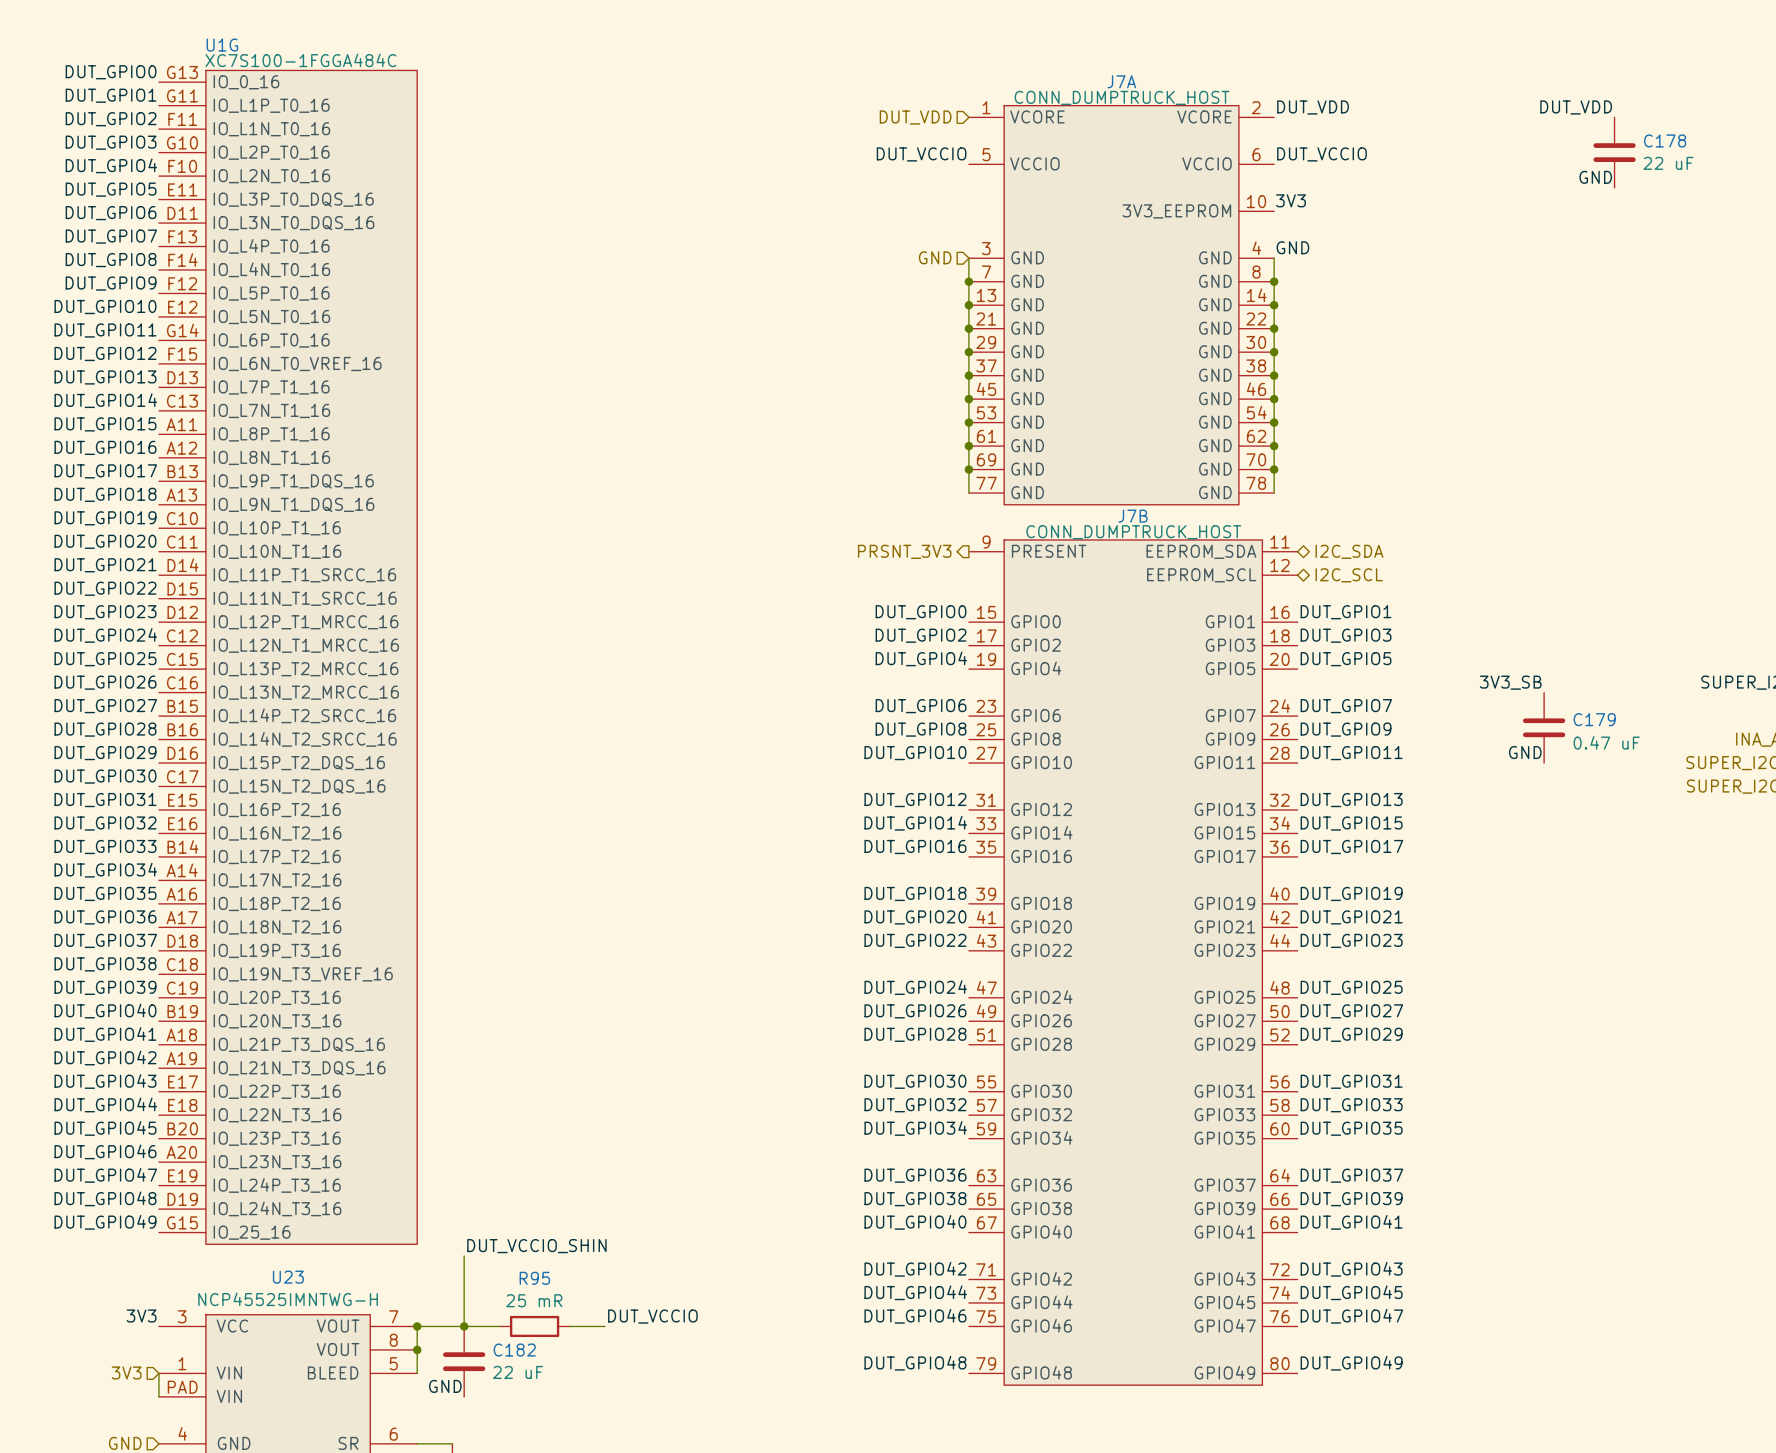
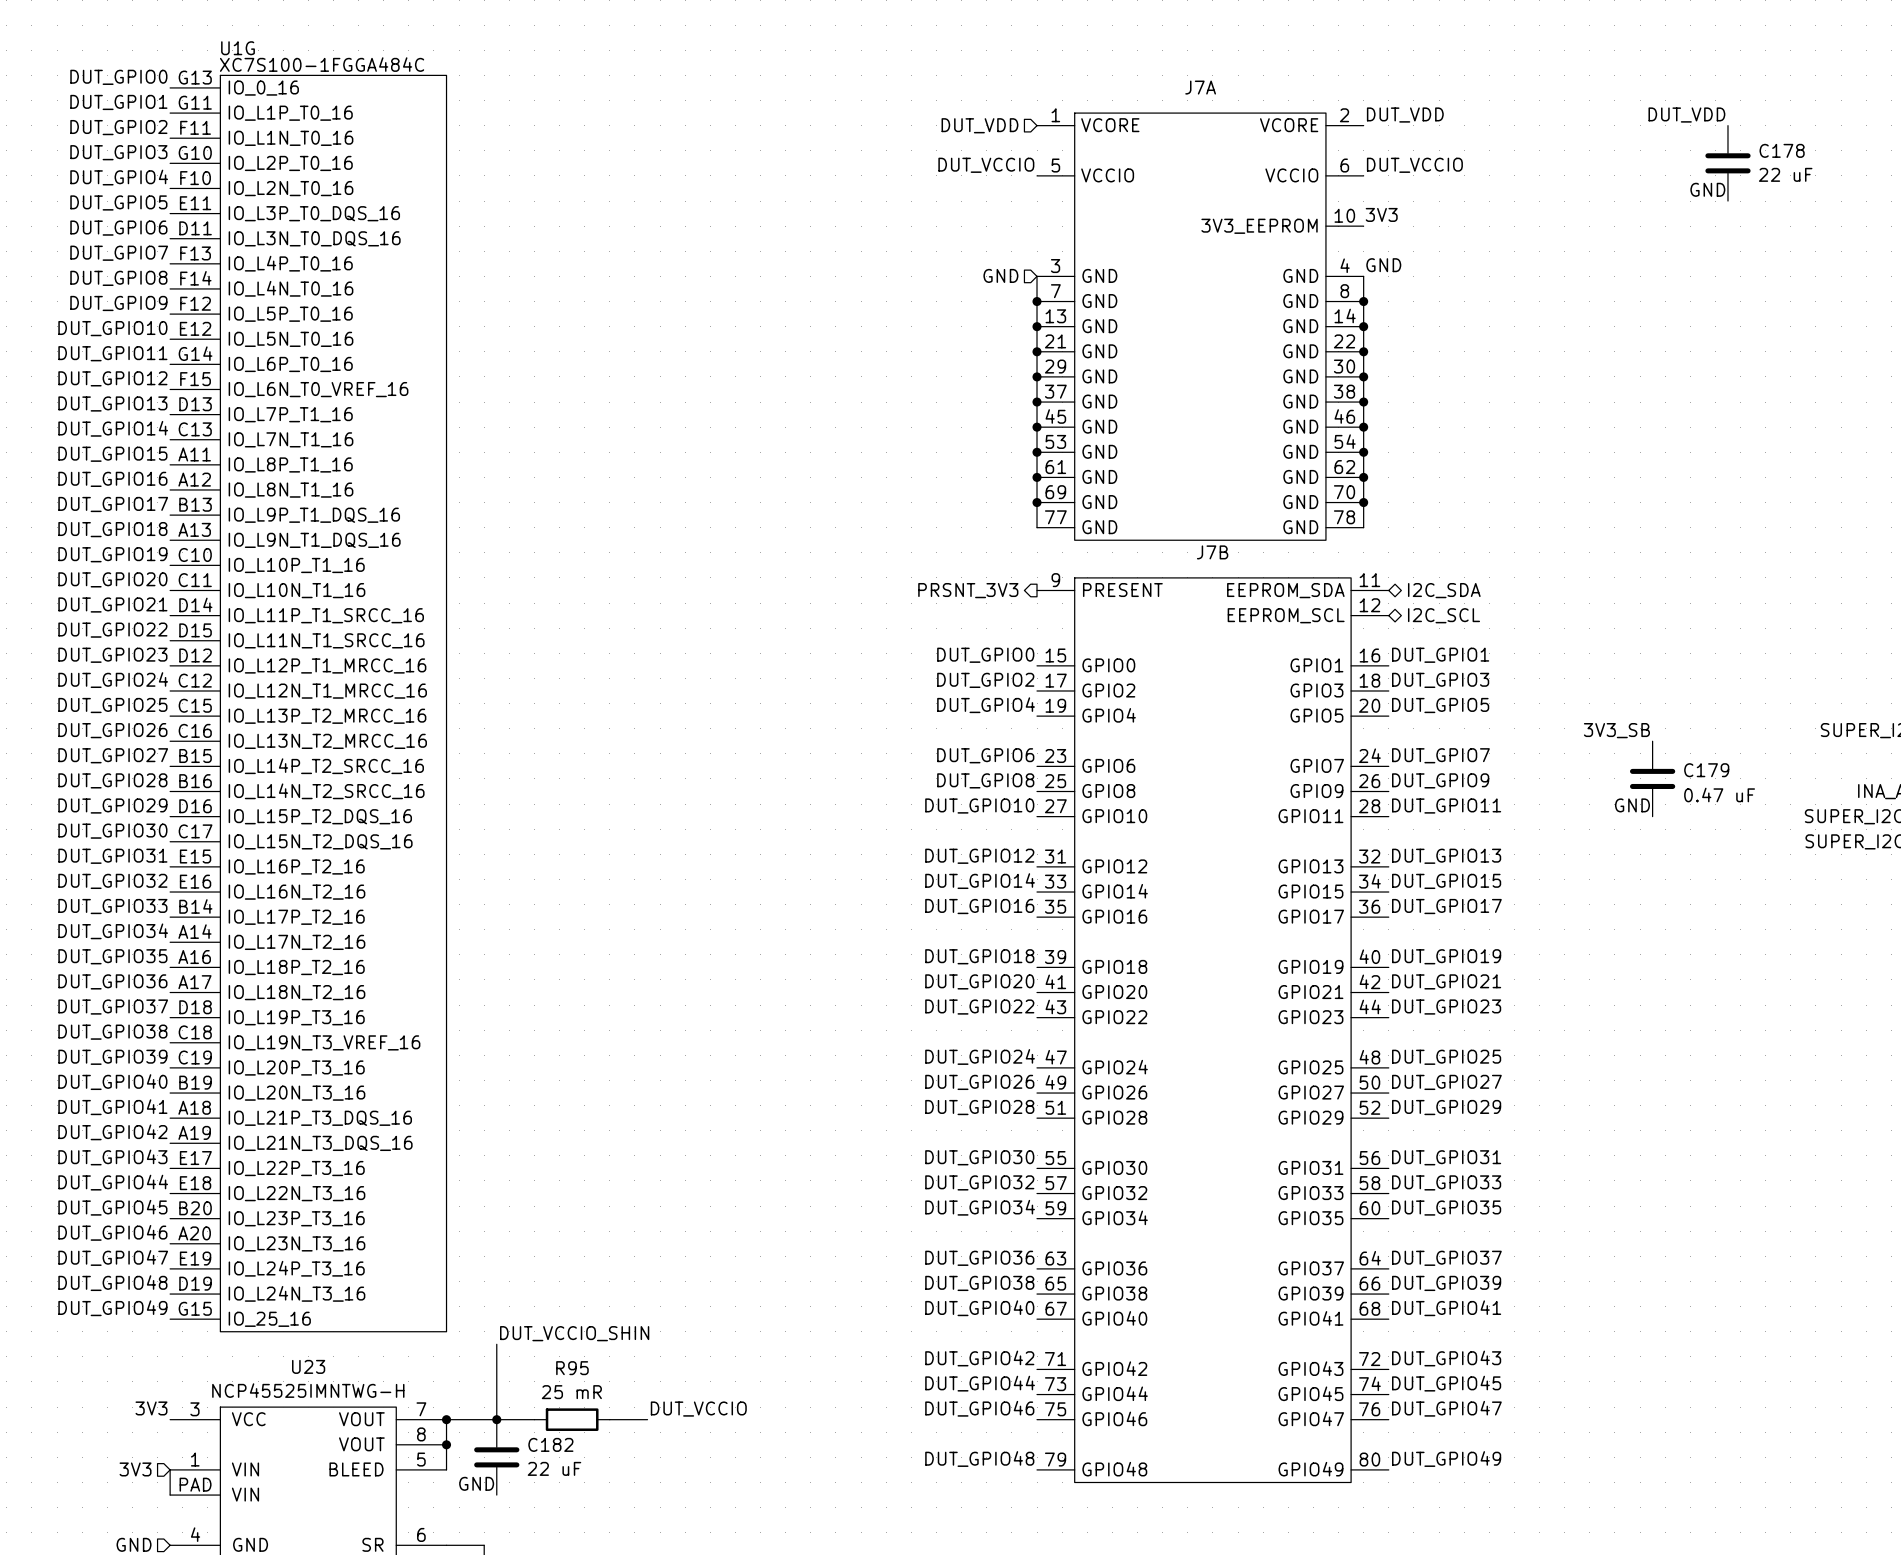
J7A value: CONN_DUMPTRUCK_HOST (1122, 97) -> none
J7B value: CONN_DUMPTRUCK_HOST (1133, 532) -> none

